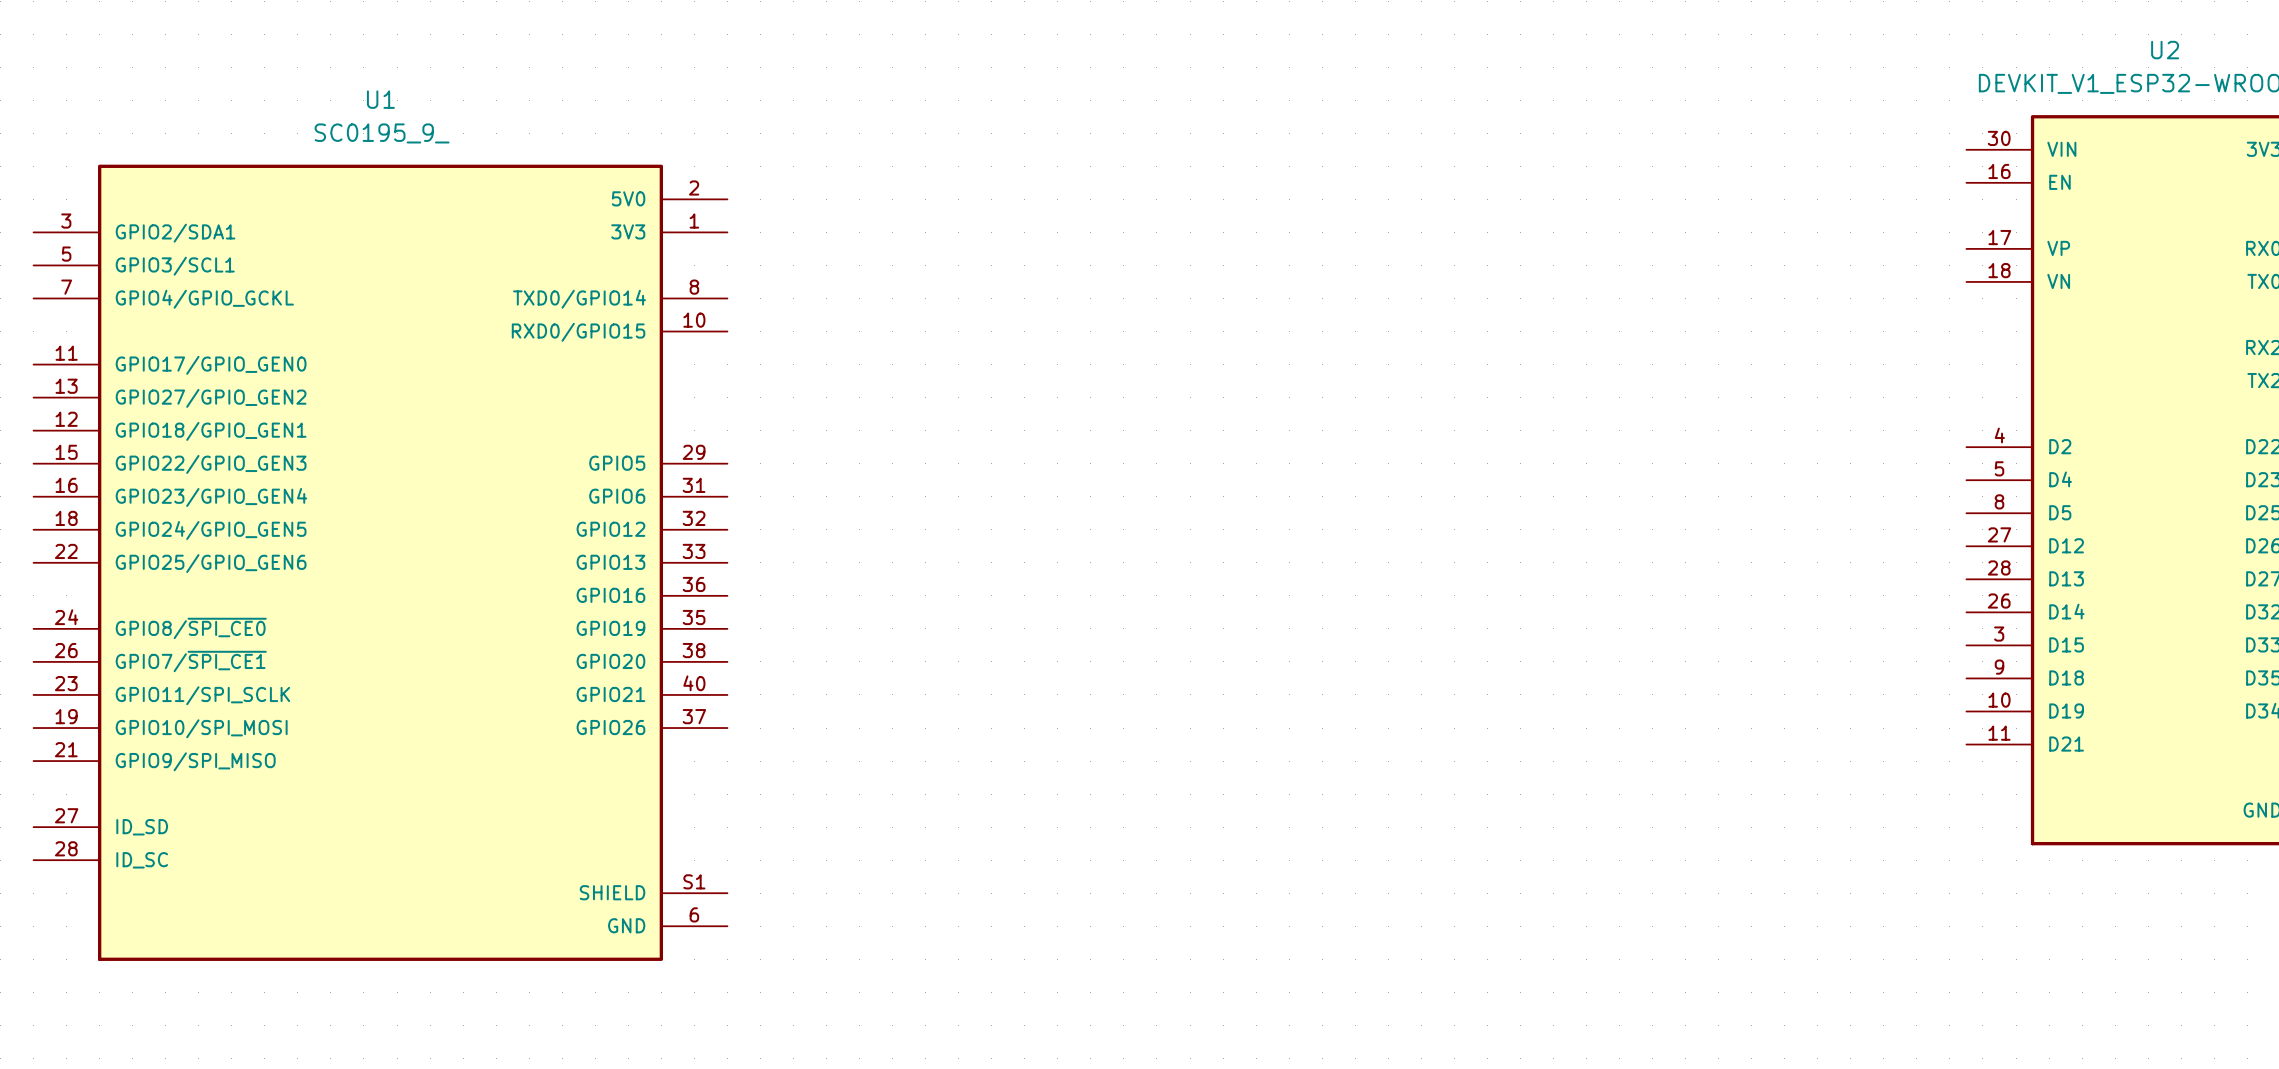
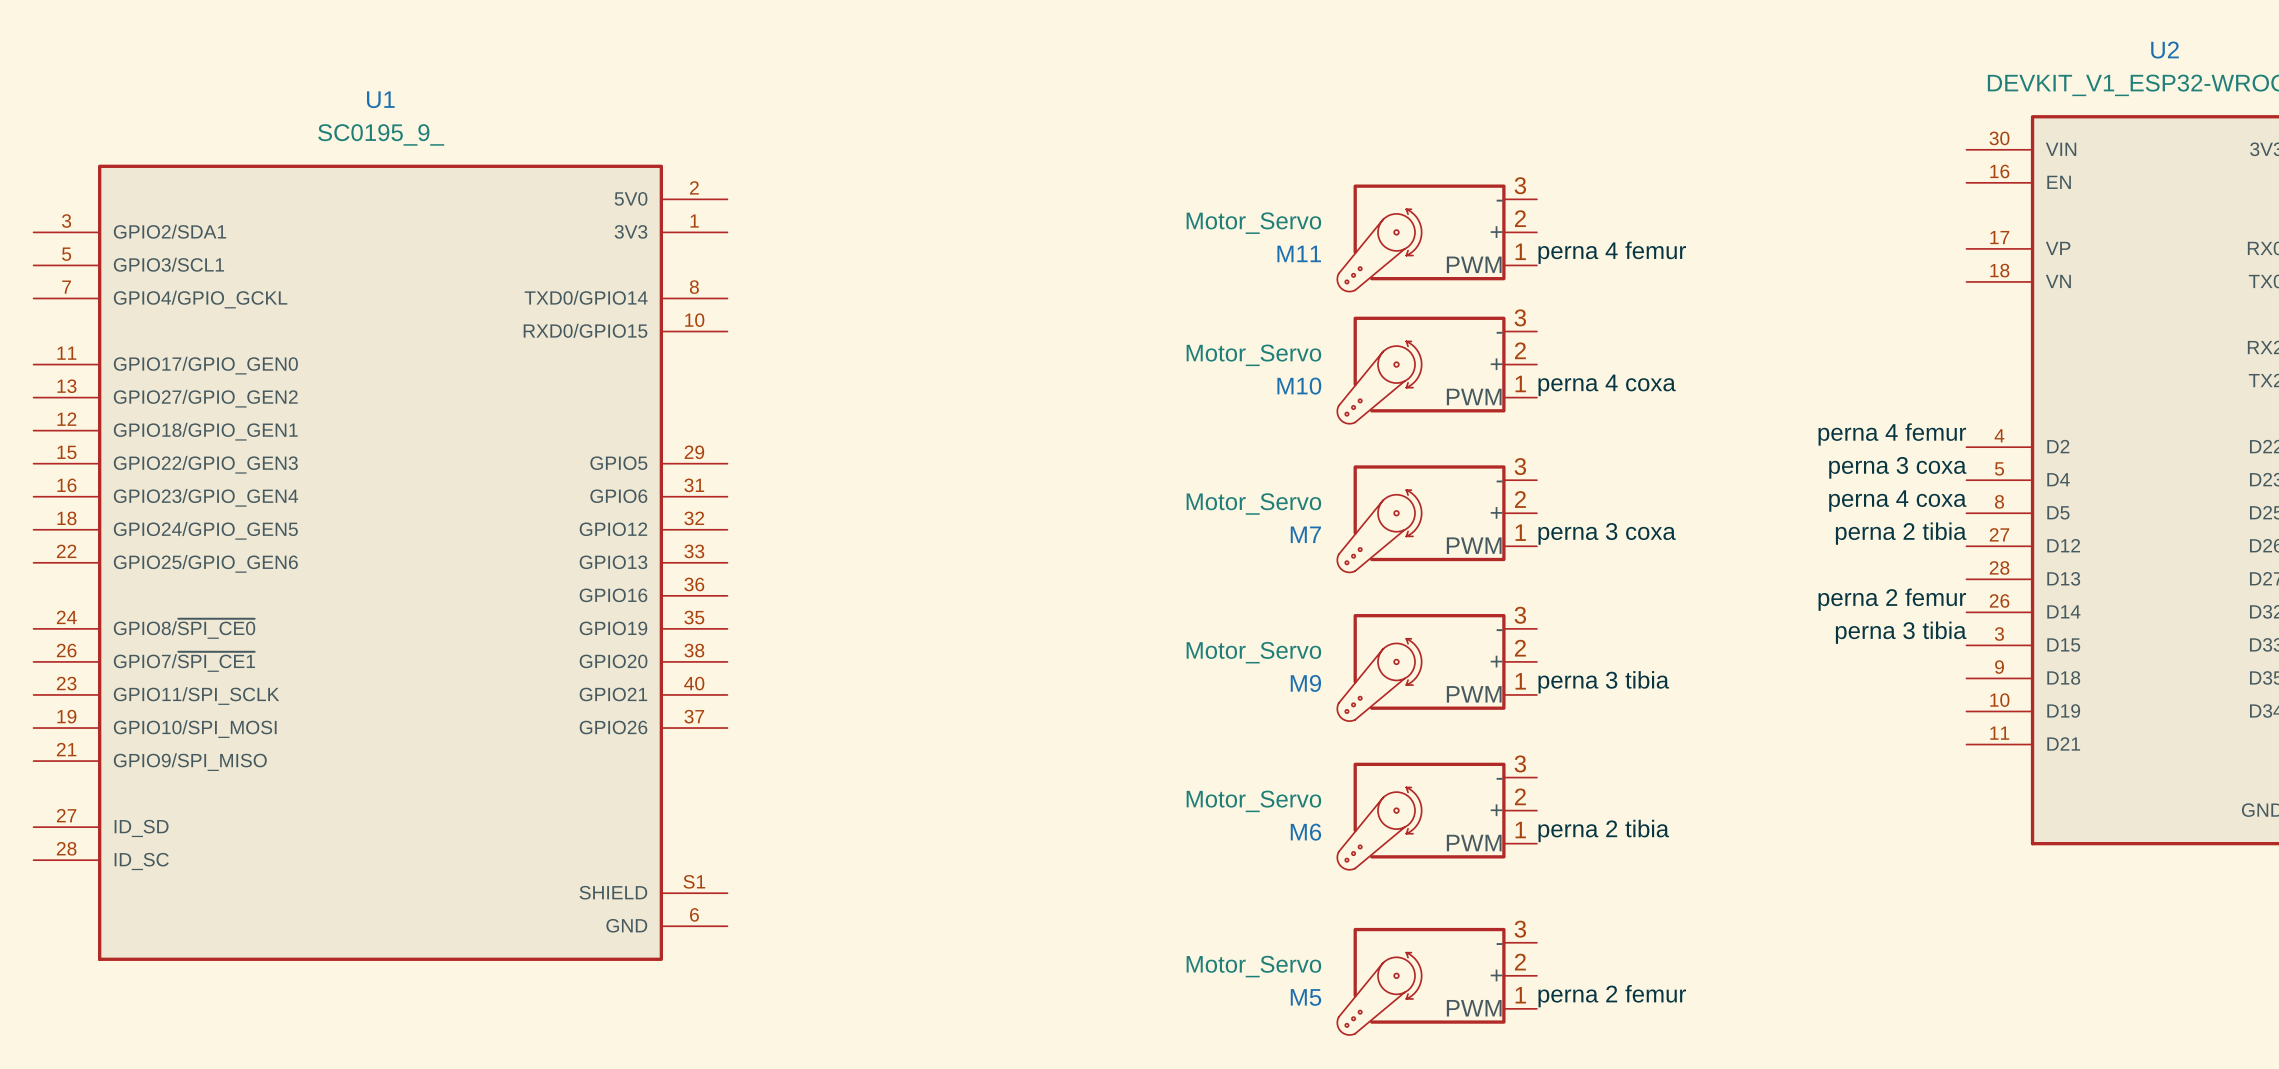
M11: none -> Motor_Servo (1437, 238)
label: none -> perna 4 femur (1612, 252)
M10: none -> Motor_Servo (1437, 370)
label: none -> perna 4 coxa (1607, 385)
label: none -> perna 4 femur (1892, 434)
label: none -> perna 3 coxa (1897, 467)
label: none -> perna 4 coxa (1897, 500)
M7: none -> Motor_Servo (1437, 518)
label: none -> perna 3 coxa (1607, 533)
label: none -> perna 2 tibia (1901, 533)
label: none -> perna 2 femur (1892, 599)
label: none -> perna 3 tibia (1901, 632)
M9: none -> Motor_Servo (1437, 667)
label: none -> perna 3 tibia (1603, 682)
M6: none -> Motor_Servo (1437, 816)
label: none -> perna 2 tibia (1603, 830)
M5: none -> Motor_Servo (1437, 981)
label: none -> perna 2 femur (1612, 996)

